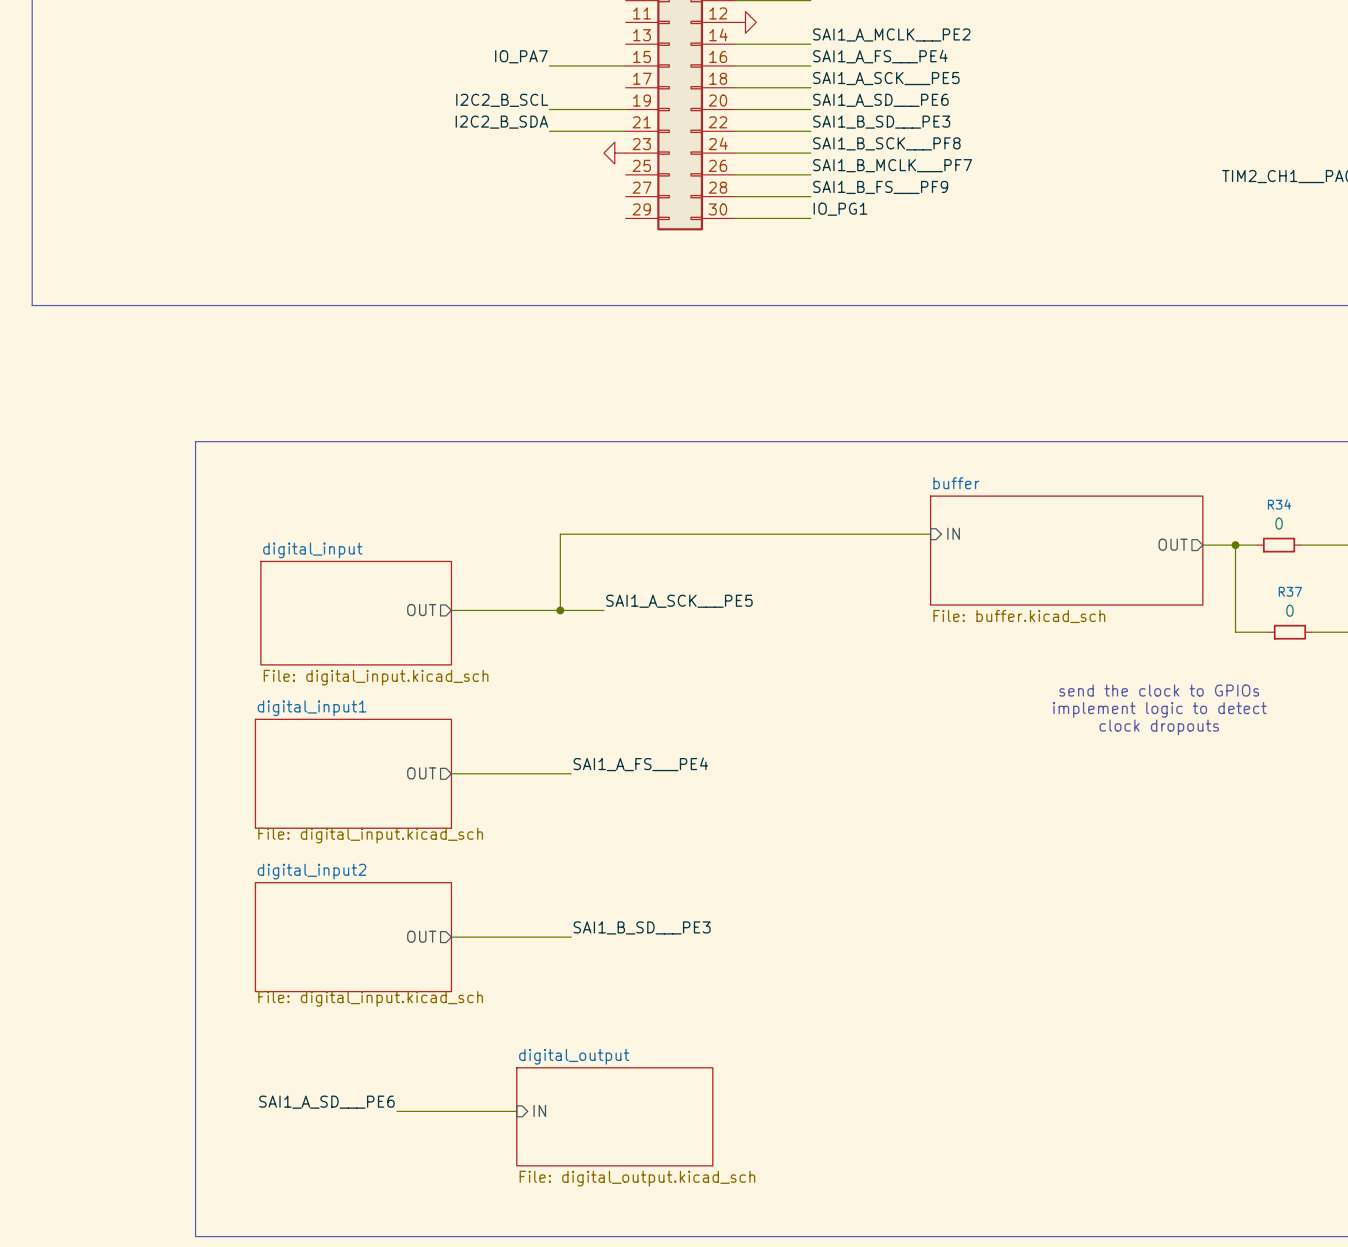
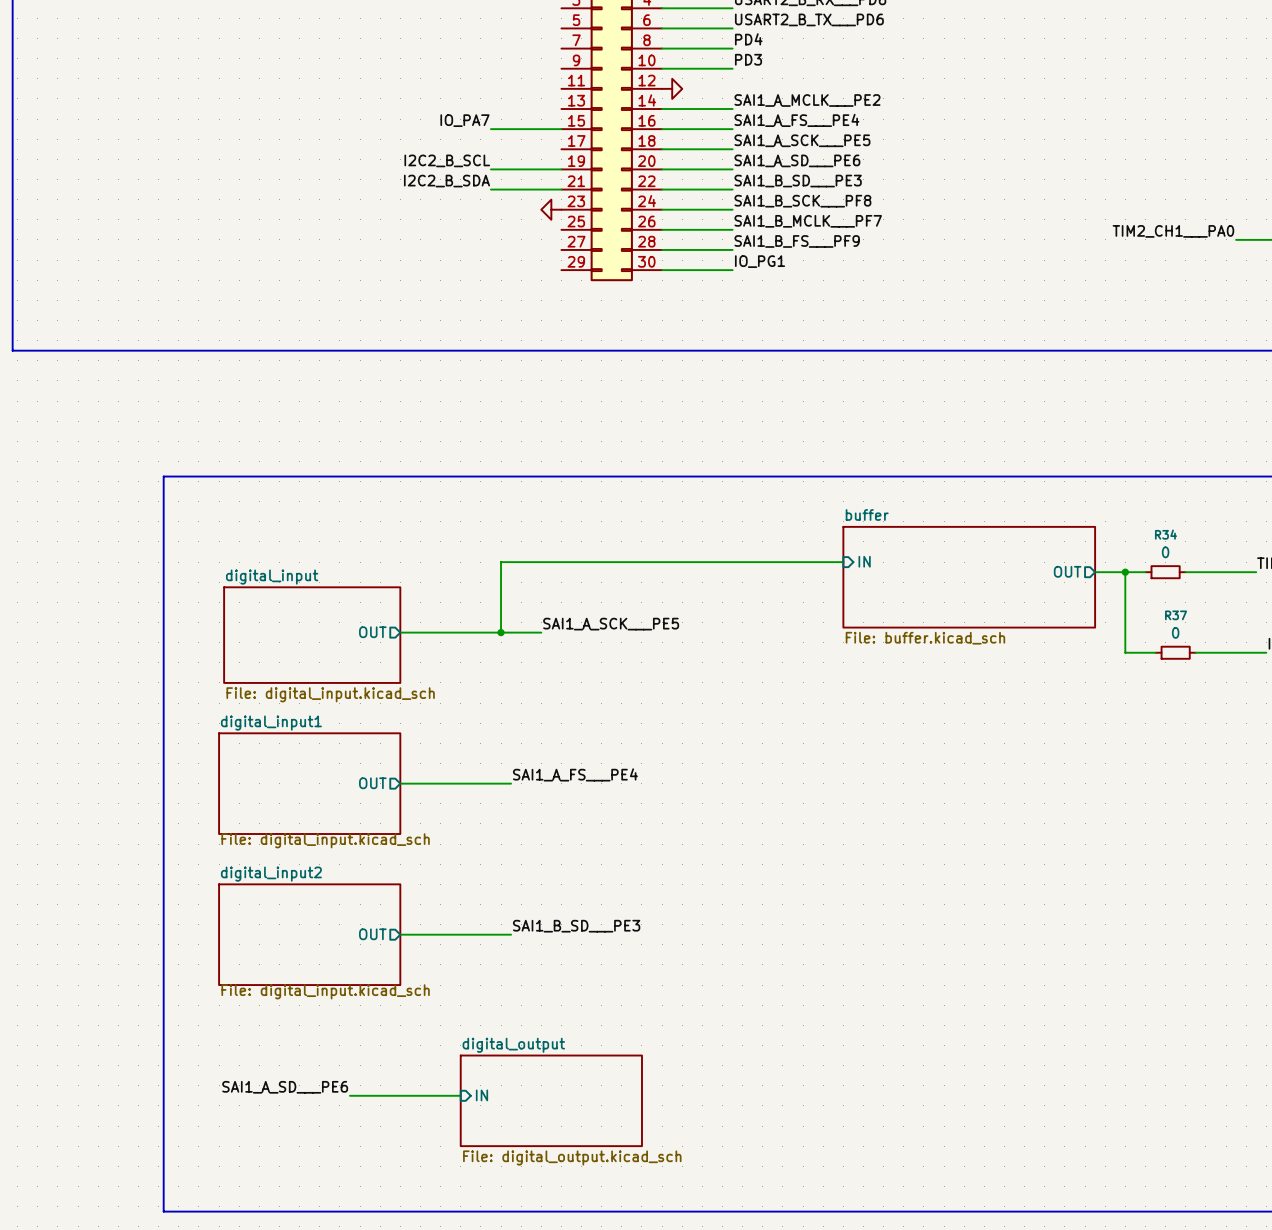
text: send the clock to GPIOs (1159, 690) -> none
text: implement logic to detect (1159, 709) -> none
text: clock dropouts (1159, 727) -> none

